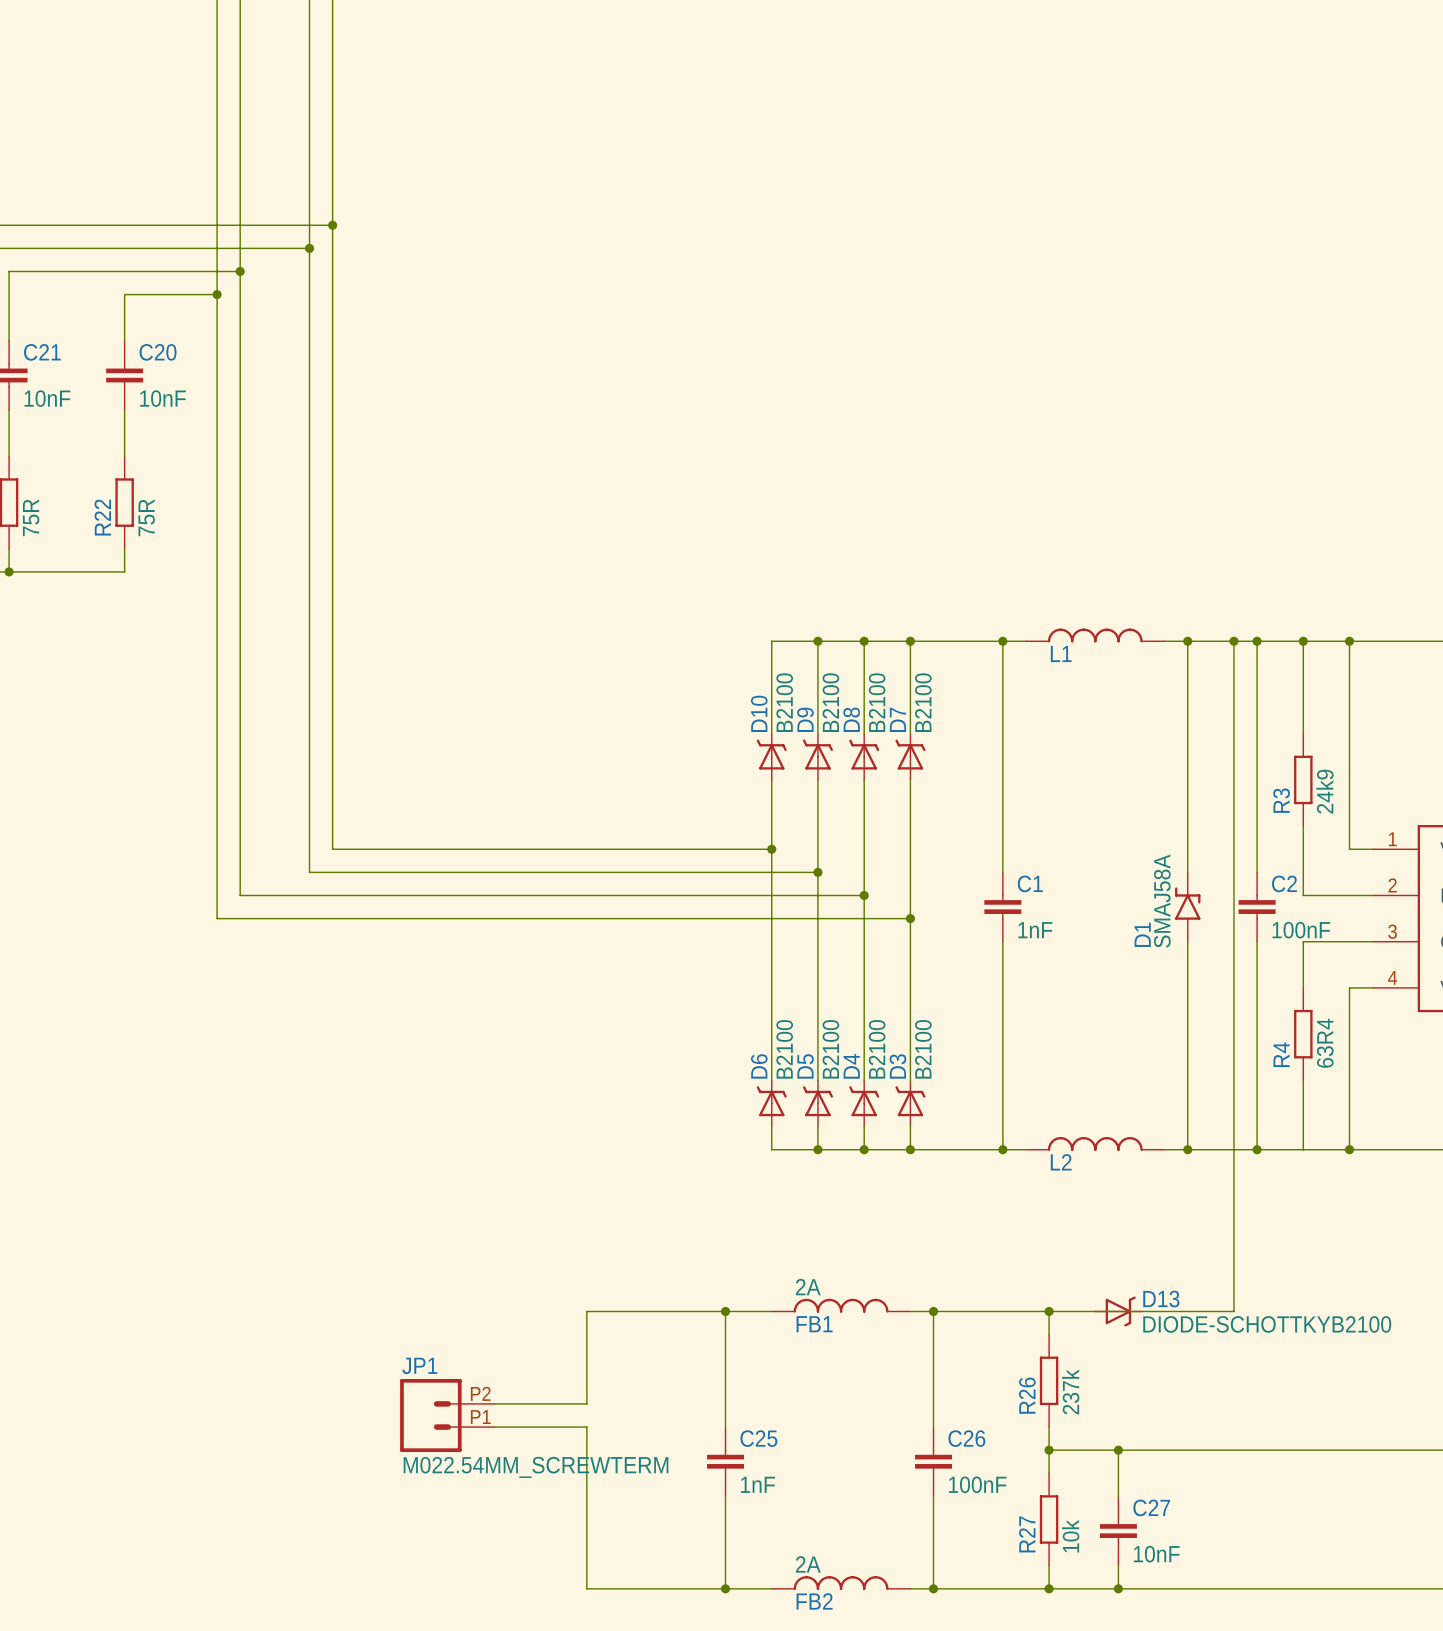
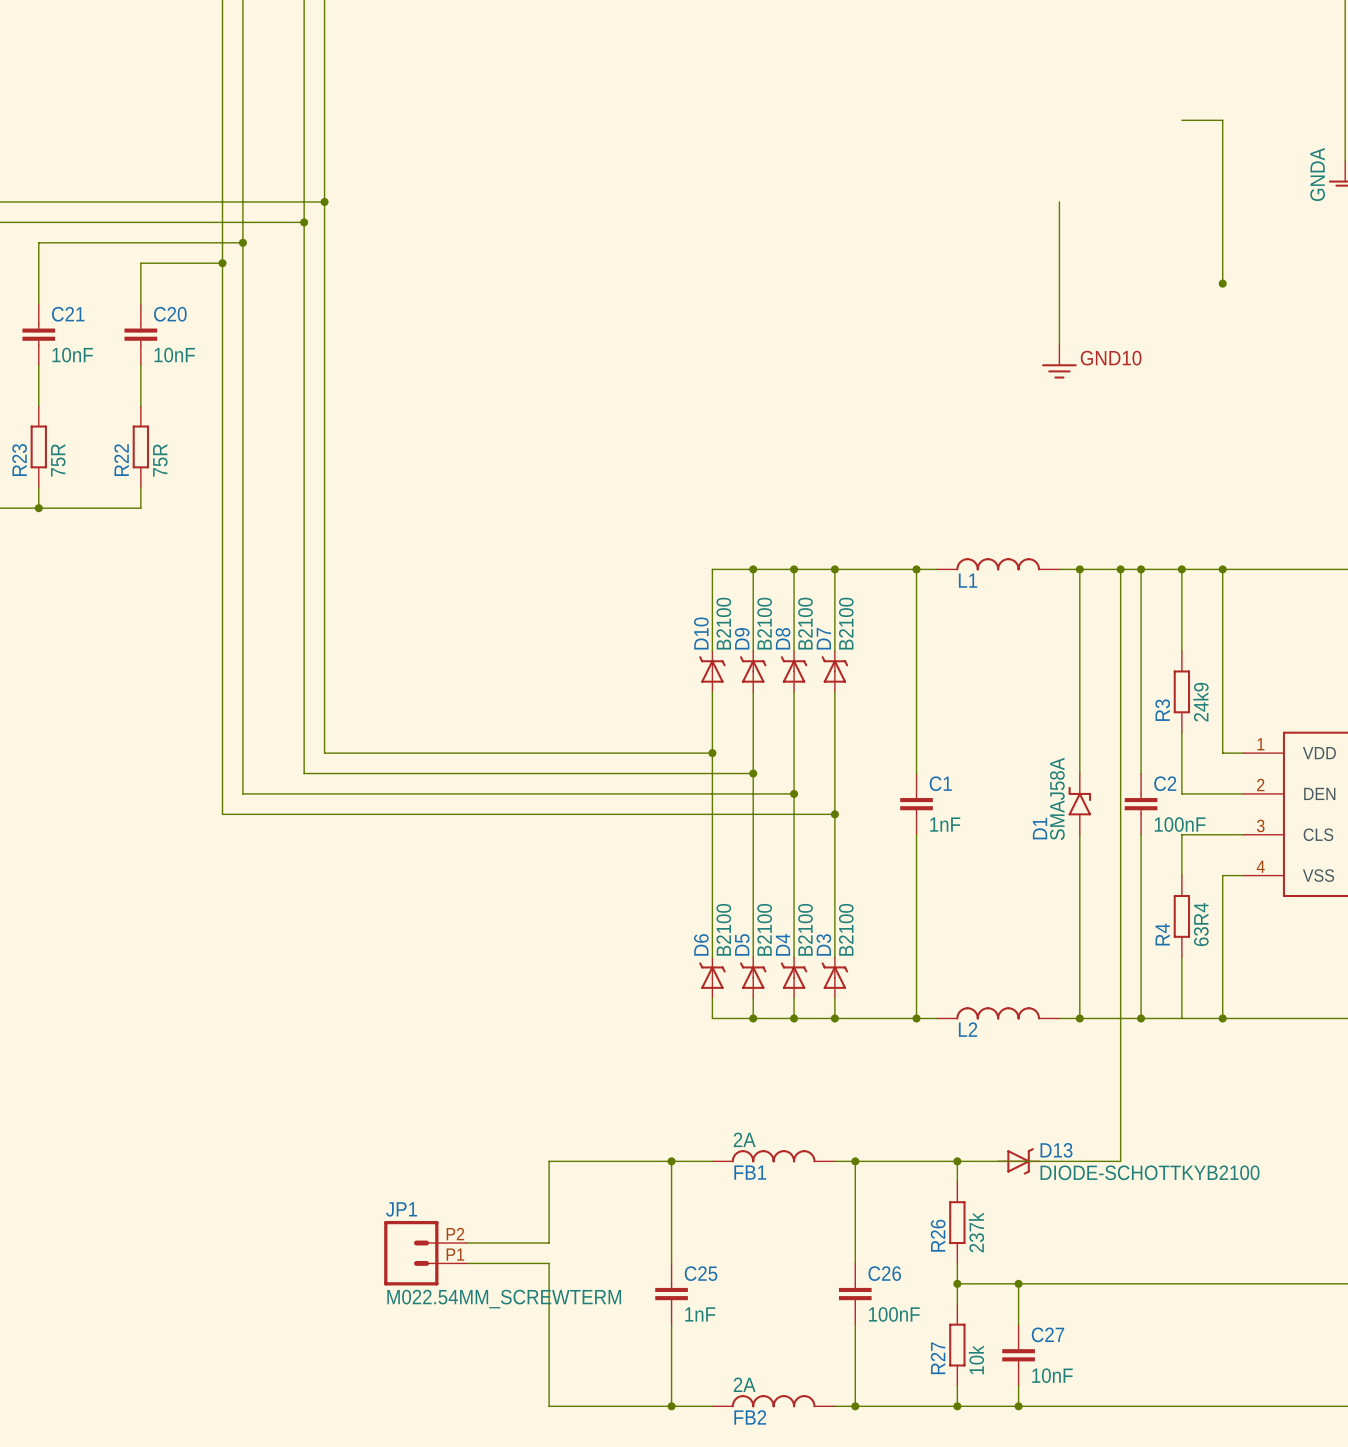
wire: none -> (1181, 120) (1222, 120) (1222, 283)
wire: none -> (1059, 201) (1059, 344)
junction: none -> (1222, 283)
GND10: none -> (1059, 361)

